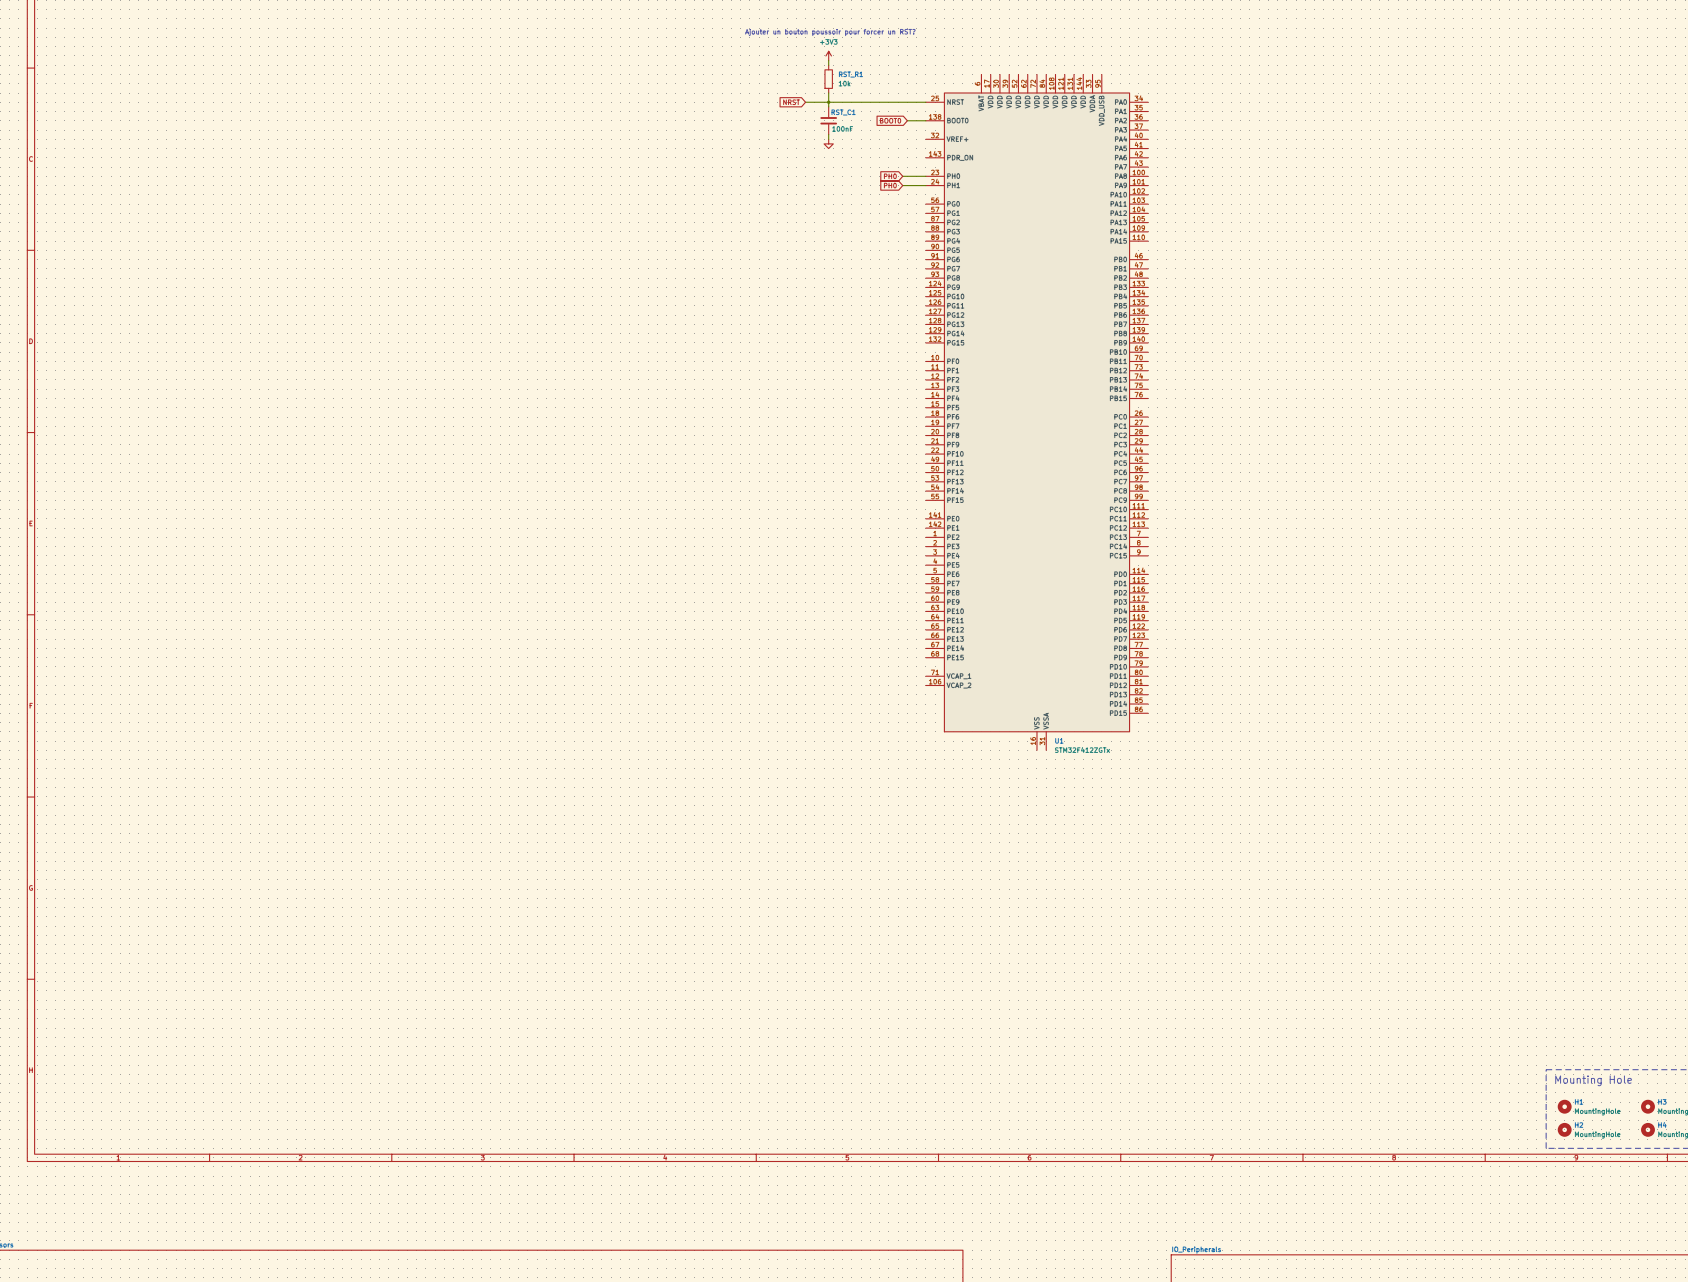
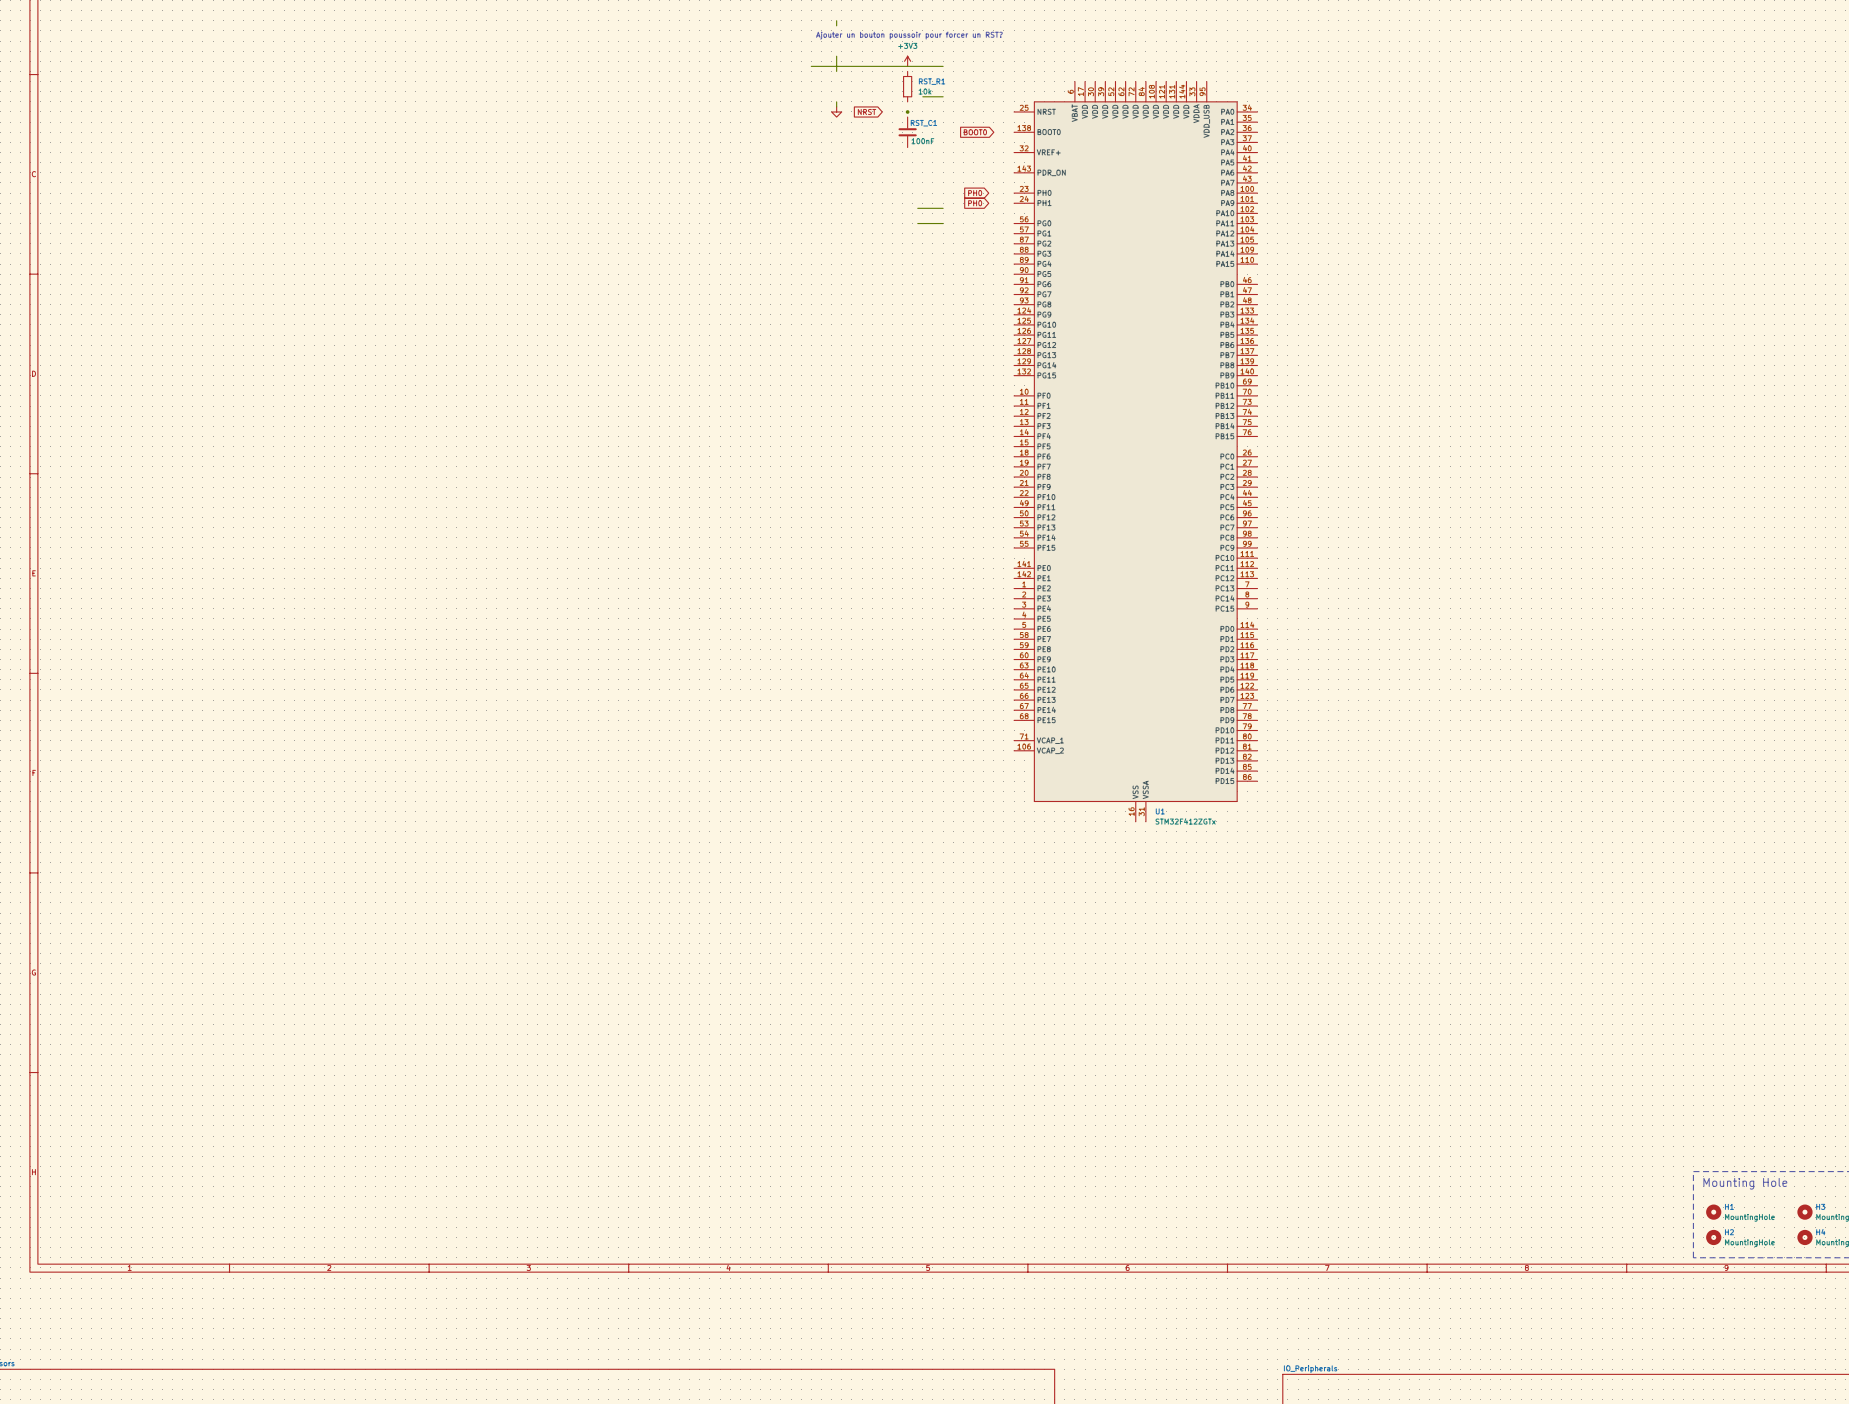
wire: (828, 60) (828, 65) -> (836, 20) (836, 25)
wire: (828, 93) (828, 106) -> (836, 56) (836, 71)
wire: (805, 102) (925, 102) -> (811, 66) (943, 66)
wire: (907, 120) (925, 120) -> (922, 96) (943, 96)
wire: (828, 134) (828, 139) -> (836, 101) (836, 106)
power symbol position: (828, 143) -> (836, 111)
wire: (902, 176) (925, 176) -> (917, 223) (943, 223)
wire: (902, 185) (925, 185) -> (917, 208) (943, 208)

